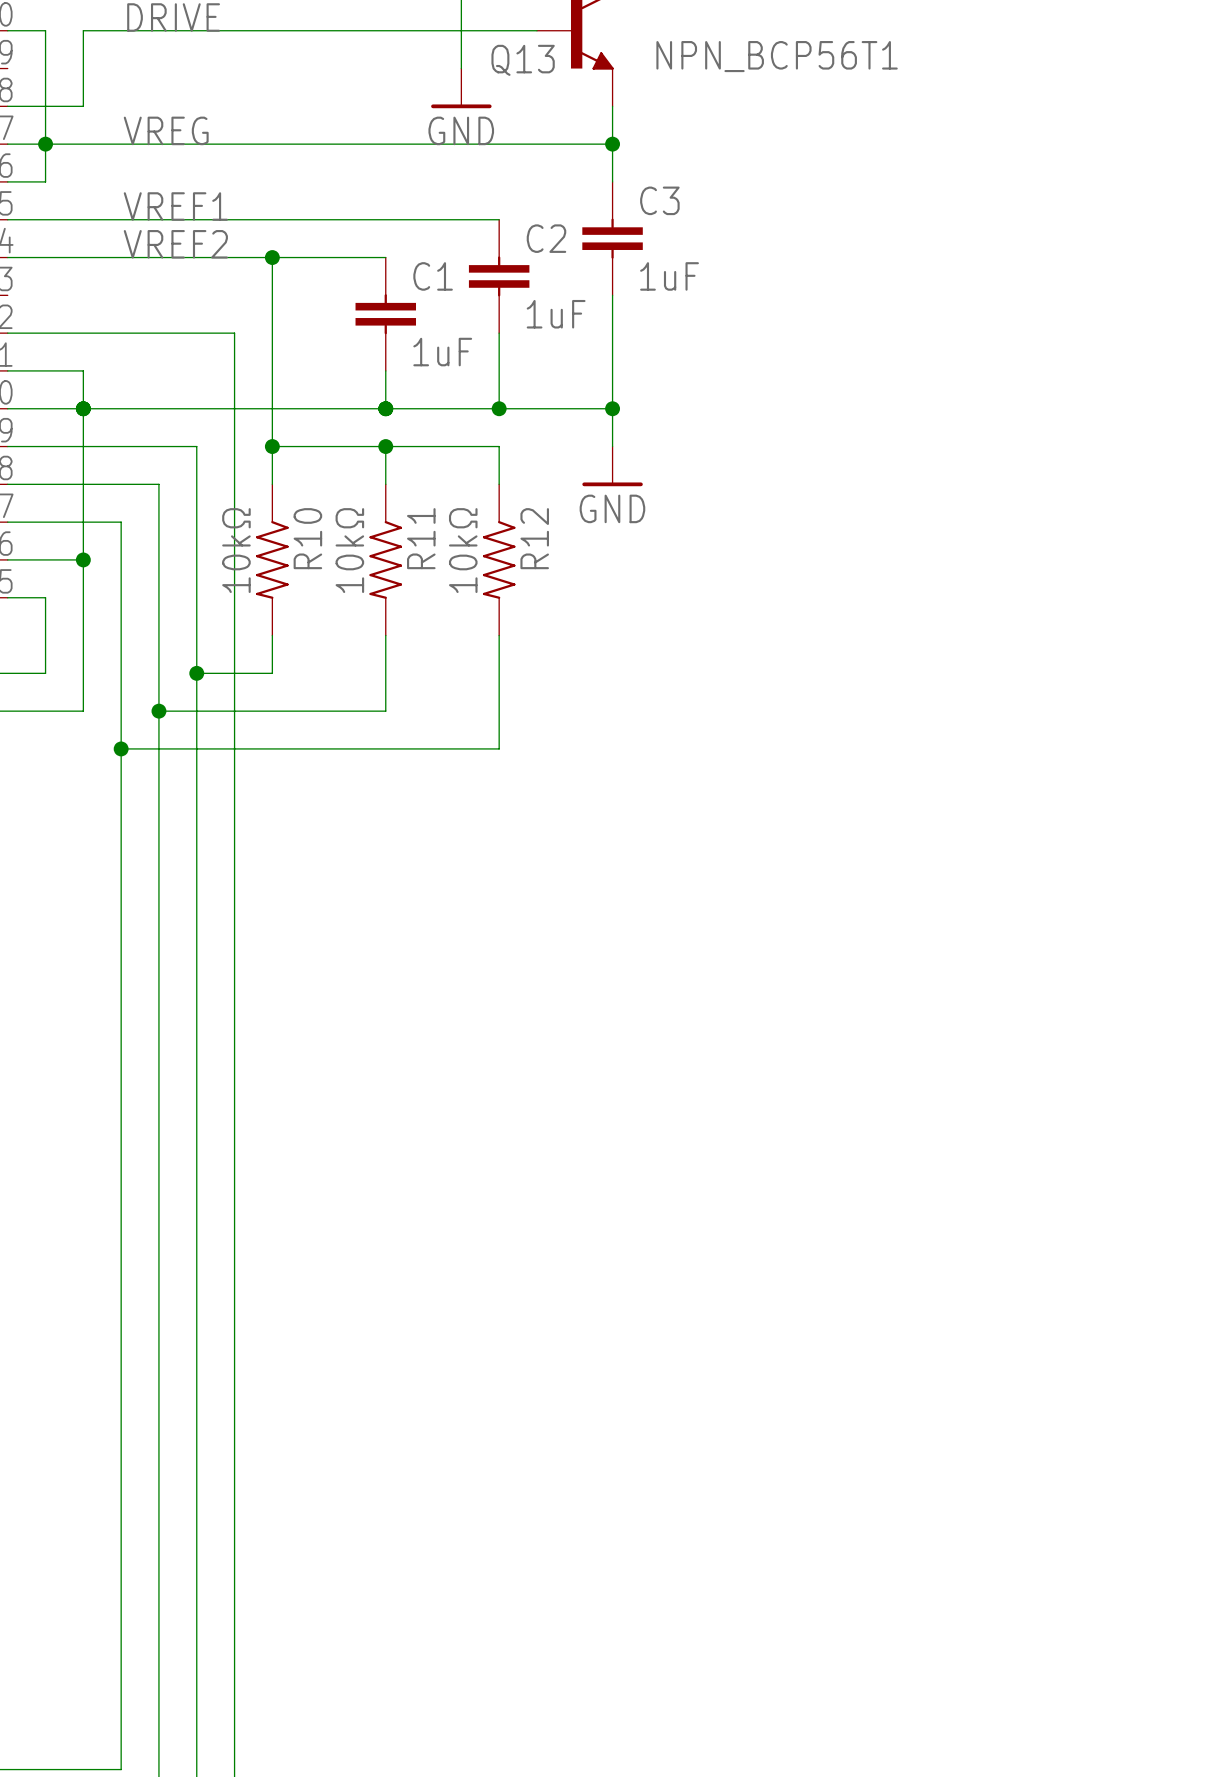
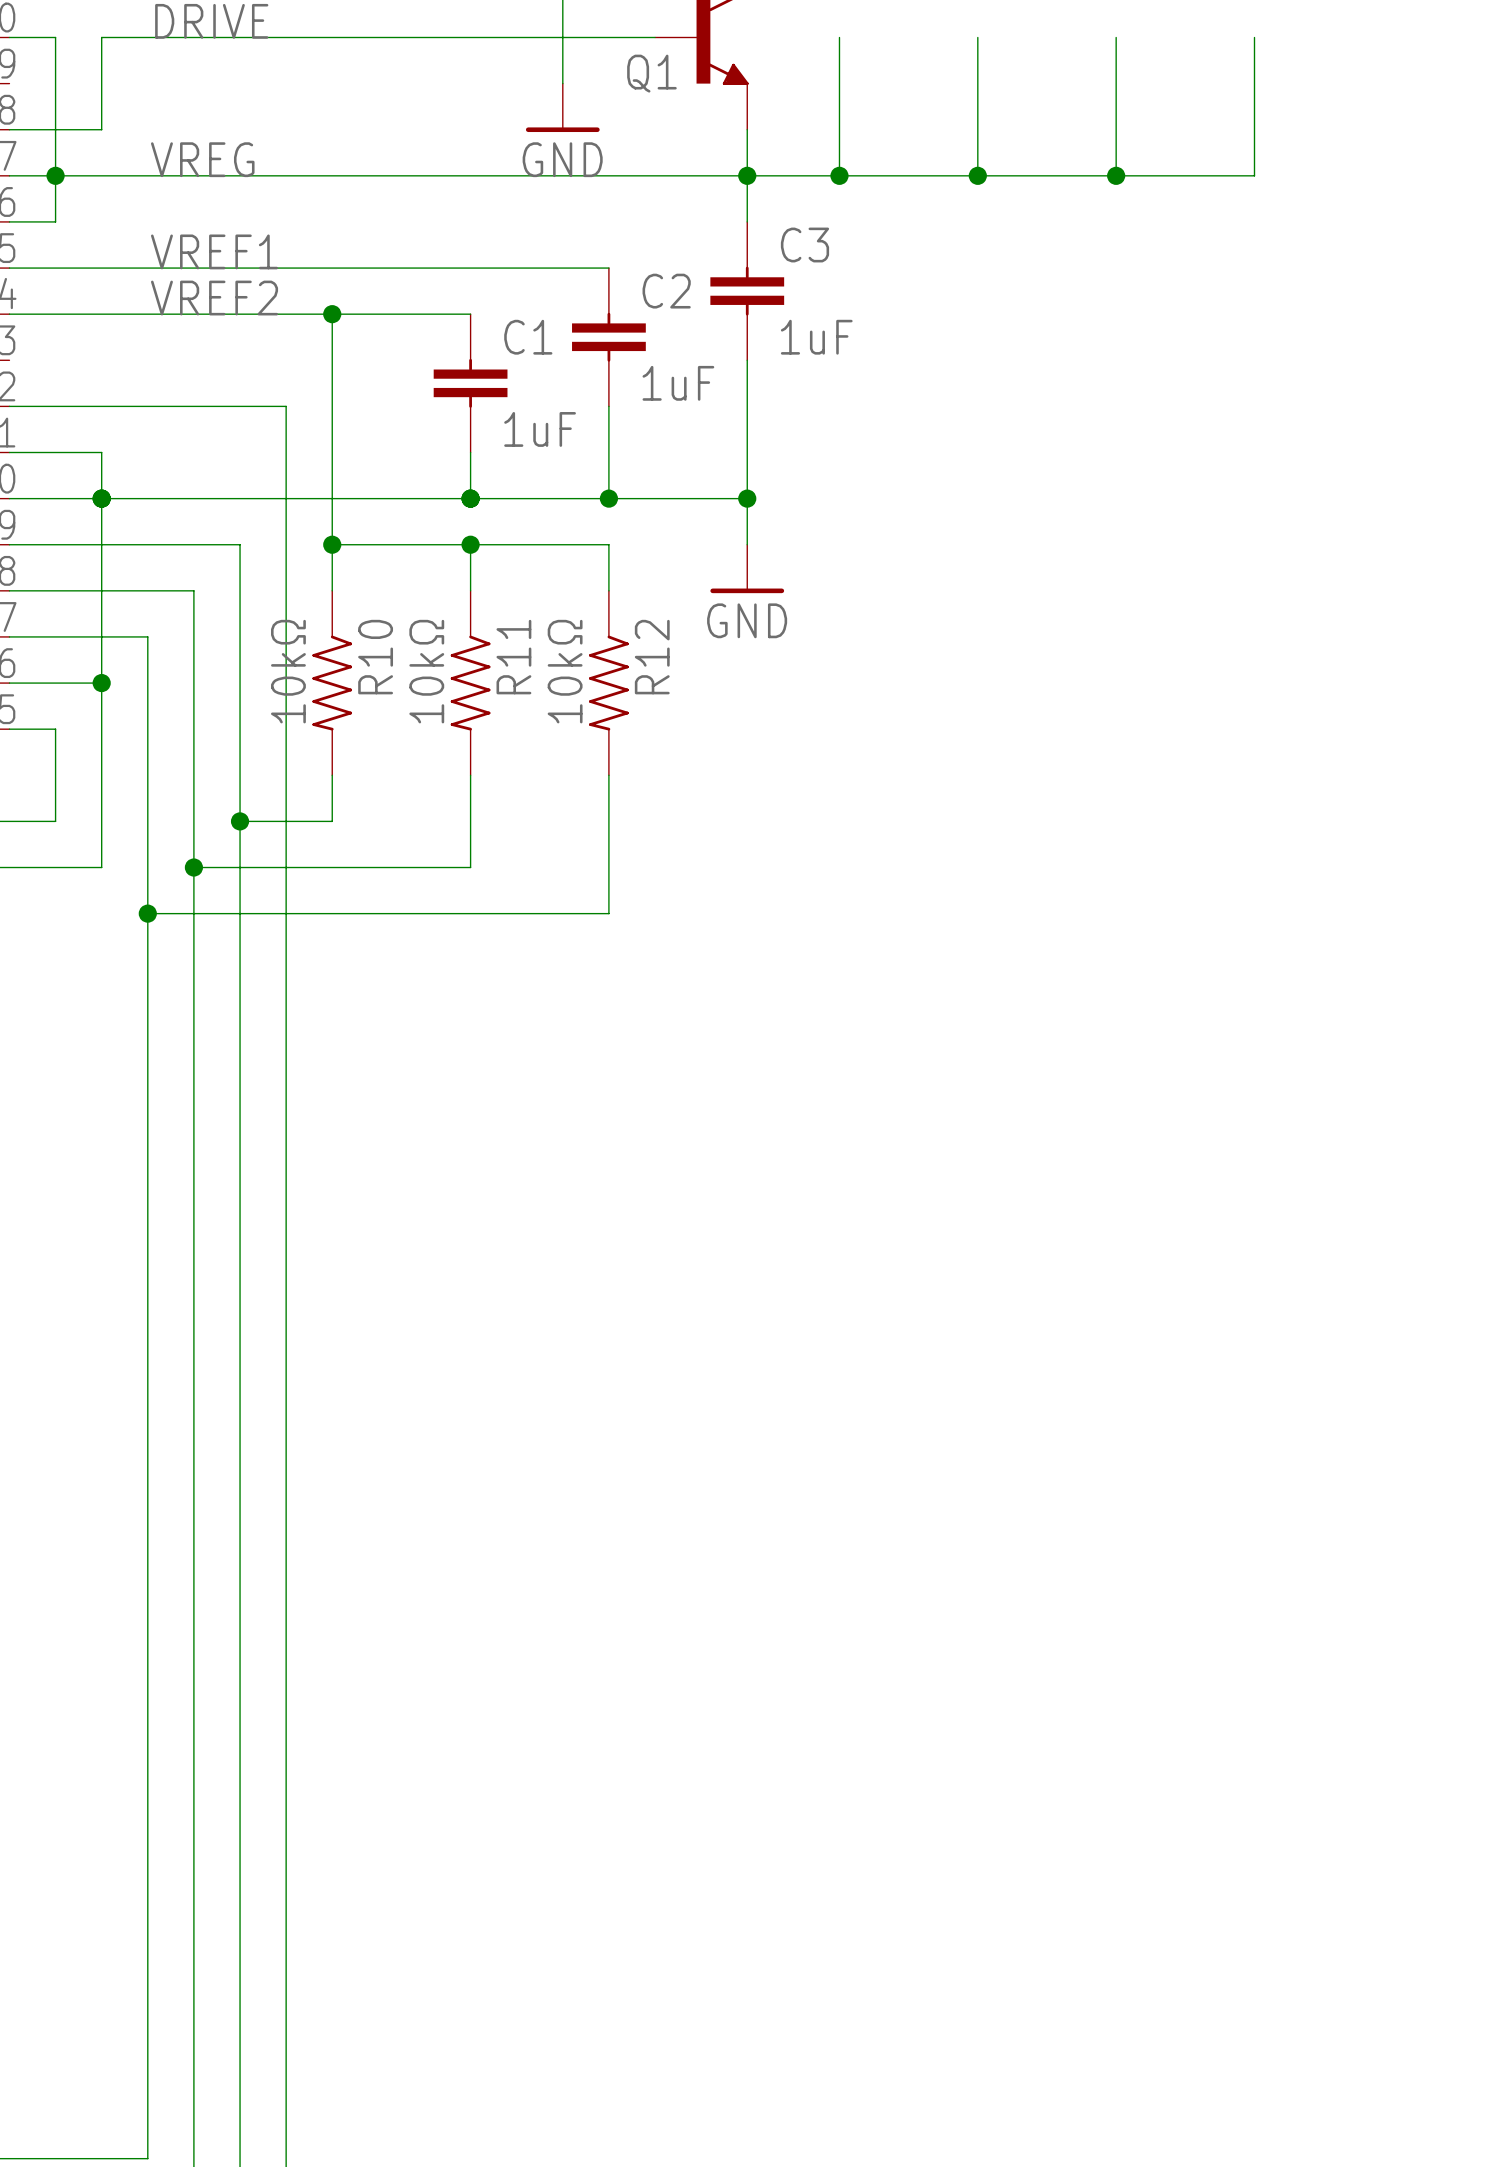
wire: none -> (839, 37) (839, 175)
wire: none -> (977, 37) (977, 175)
wire: none -> (1116, 37) (1116, 175)
wire: none -> (1254, 37) (1254, 175) (747, 175)
Q13 value: NPN_BCP56T1 (777, 56) -> none
Q13 name: Q13 (523, 60) -> Q1 (651, 73)
junction: none -> (839, 175)
junction: none -> (977, 175)
junction: none -> (1116, 175)

